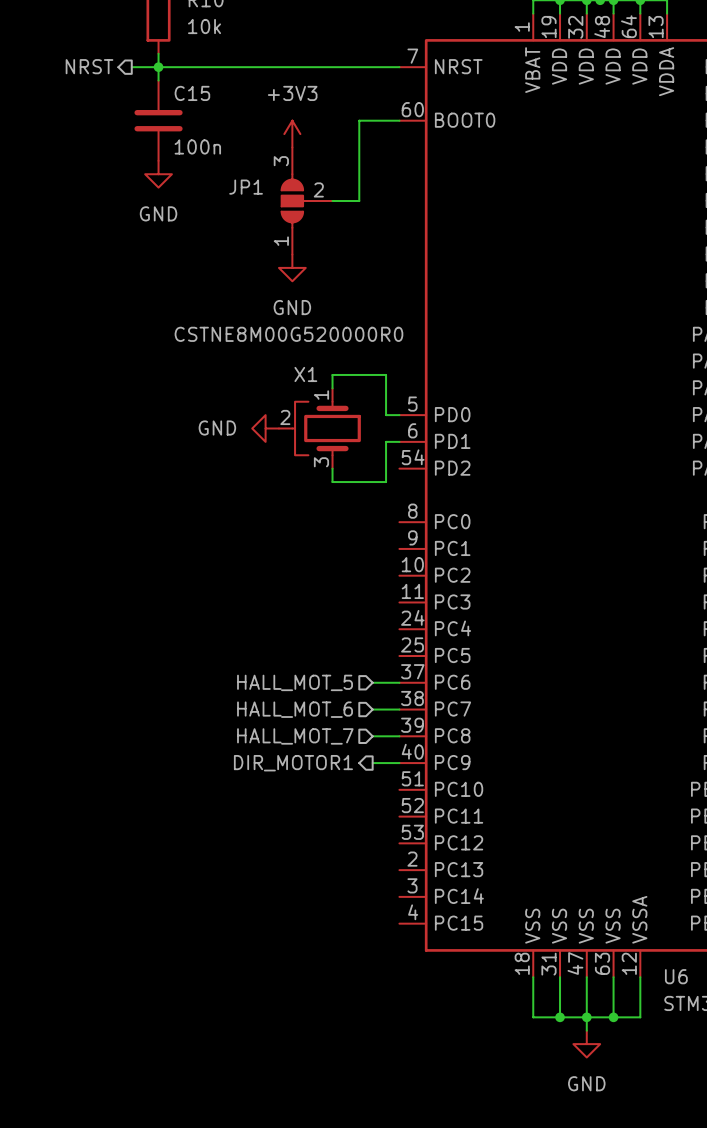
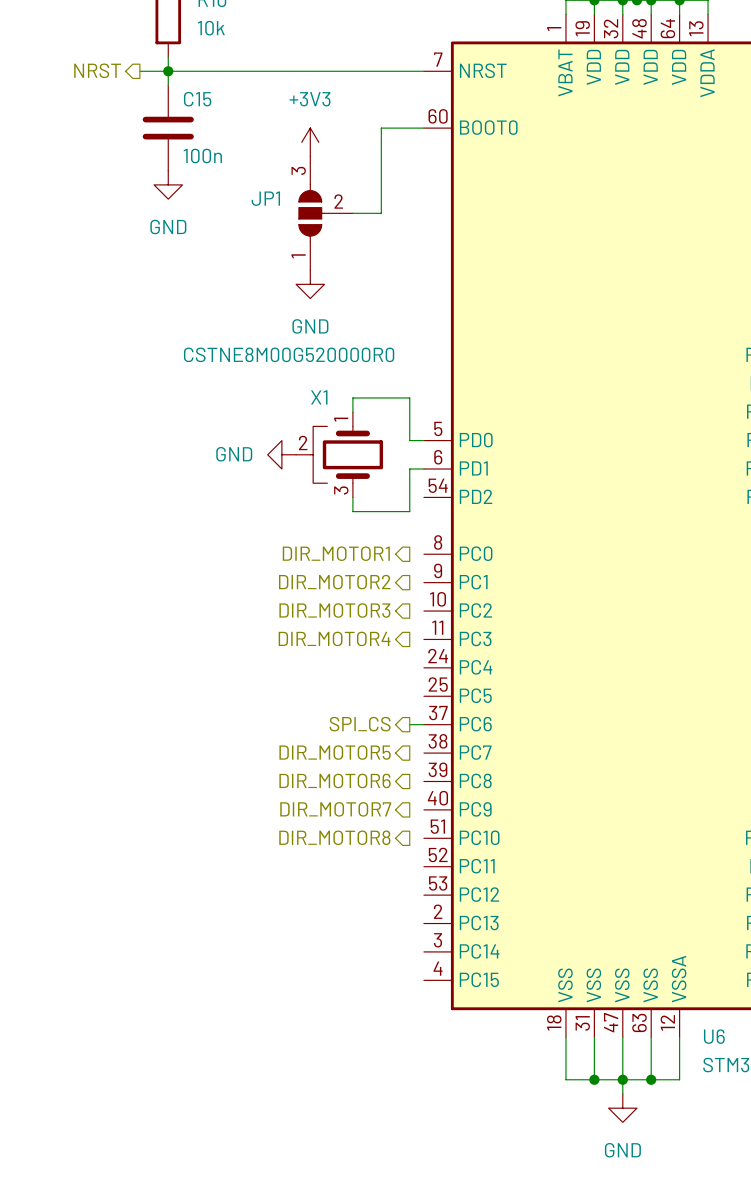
hierarchical label: none -> DIR_MOTOR2 (334, 582)
hierarchical label: none -> DIR_MOTOR3 (334, 610)
hierarchical label: none -> DIR_MOTOR4 (334, 638)
hierarchical label: HALL_MOT_5 (295, 682) -> none
hierarchical label: none -> SPI_CS (360, 724)
wire: (372, 682) (386, 682) -> none
hierarchical label: HALL_MOT_6 (295, 709) -> none
hierarchical label: none -> DIR_MOTOR5 (335, 752)
wire: (372, 709) (399, 709) -> none
hierarchical label: HALL_MOT_7 (295, 736) -> none
hierarchical label: none -> DIR_MOTOR6 (335, 780)
wire: (372, 736) (399, 736) -> none
hierarchical label position: DIR_MOTOR1 (293, 763) -> DIR_MOTOR1 (336, 553)
hierarchical label: none -> DIR_MOTOR7 (335, 809)
wire: (372, 763) (399, 763) -> none
hierarchical label: none -> DIR_MOTOR8 (334, 837)

